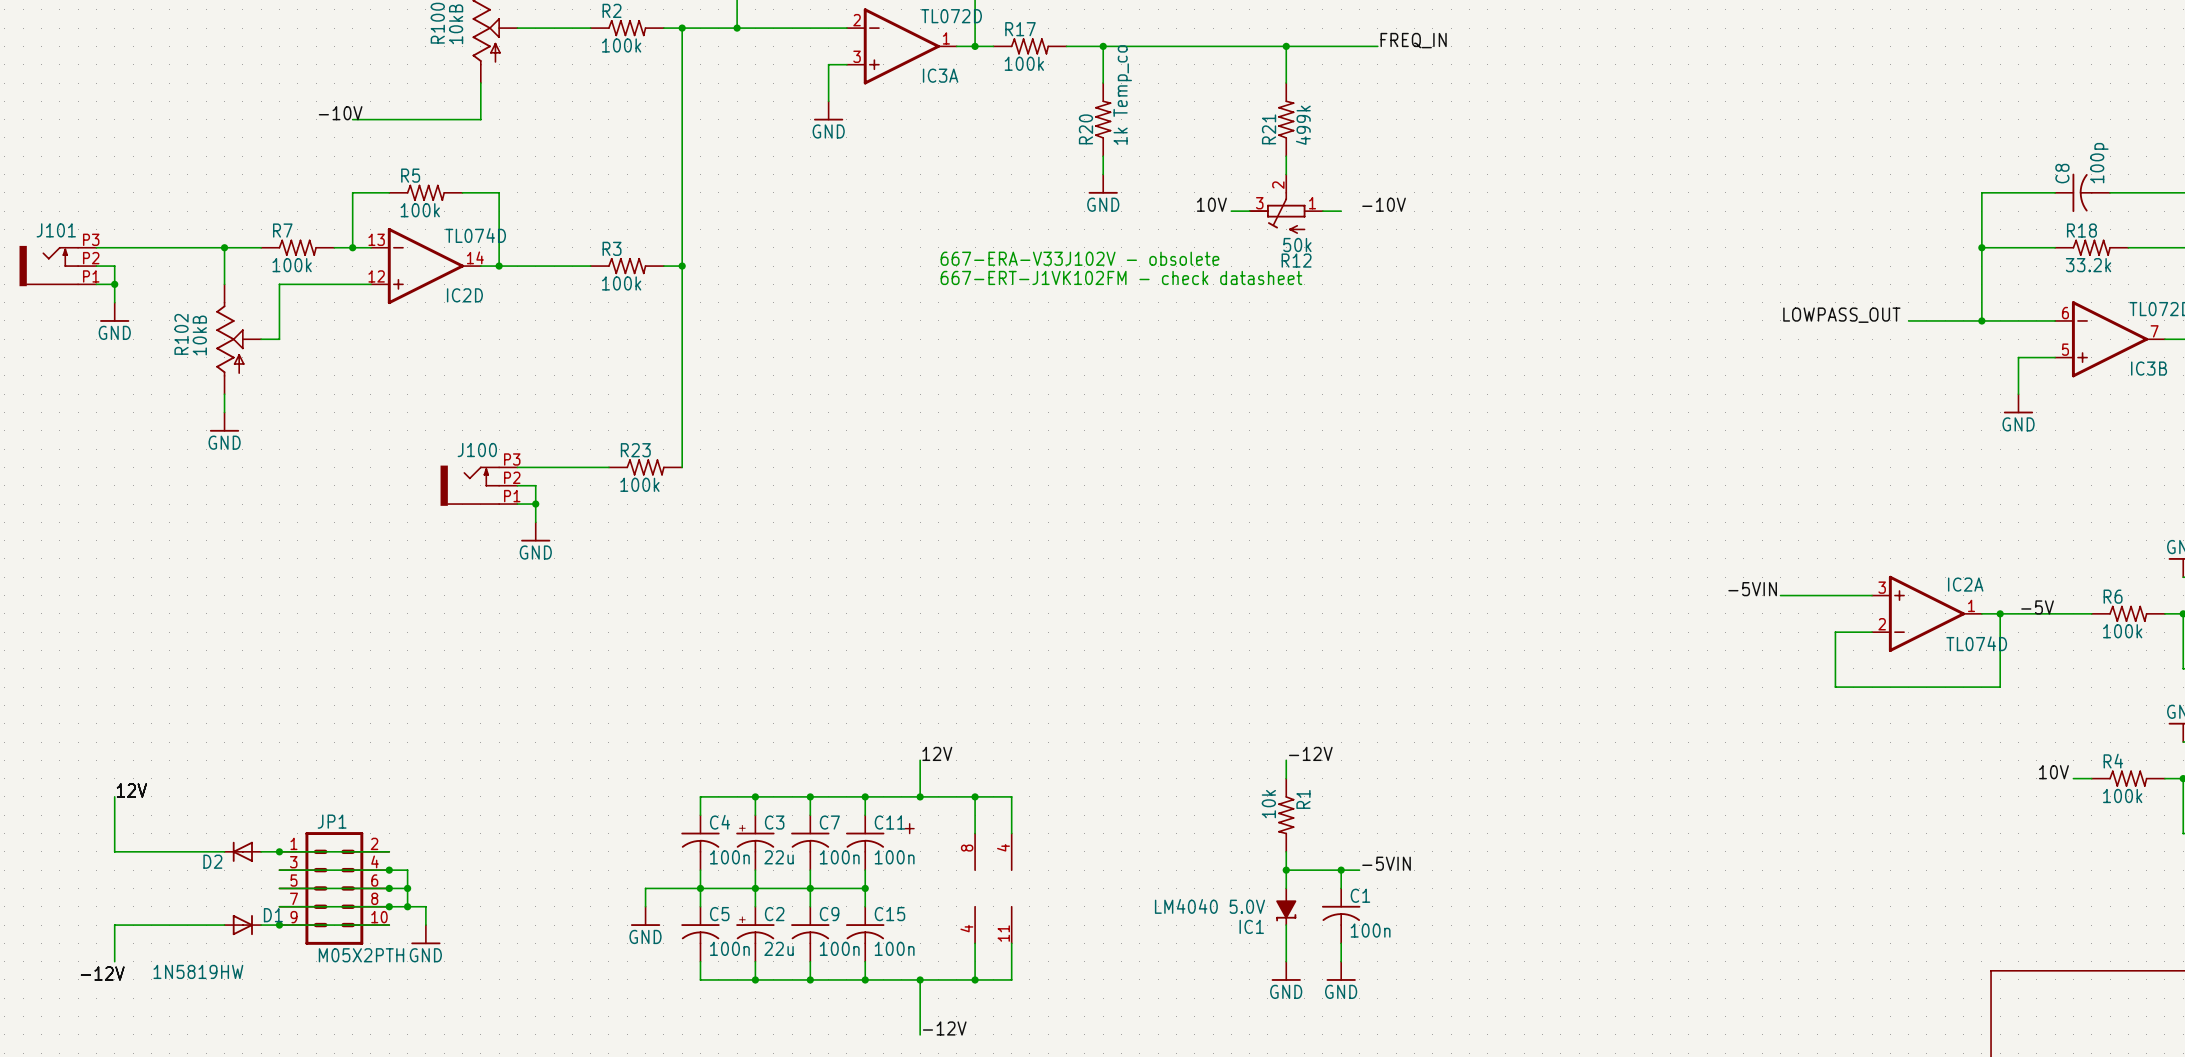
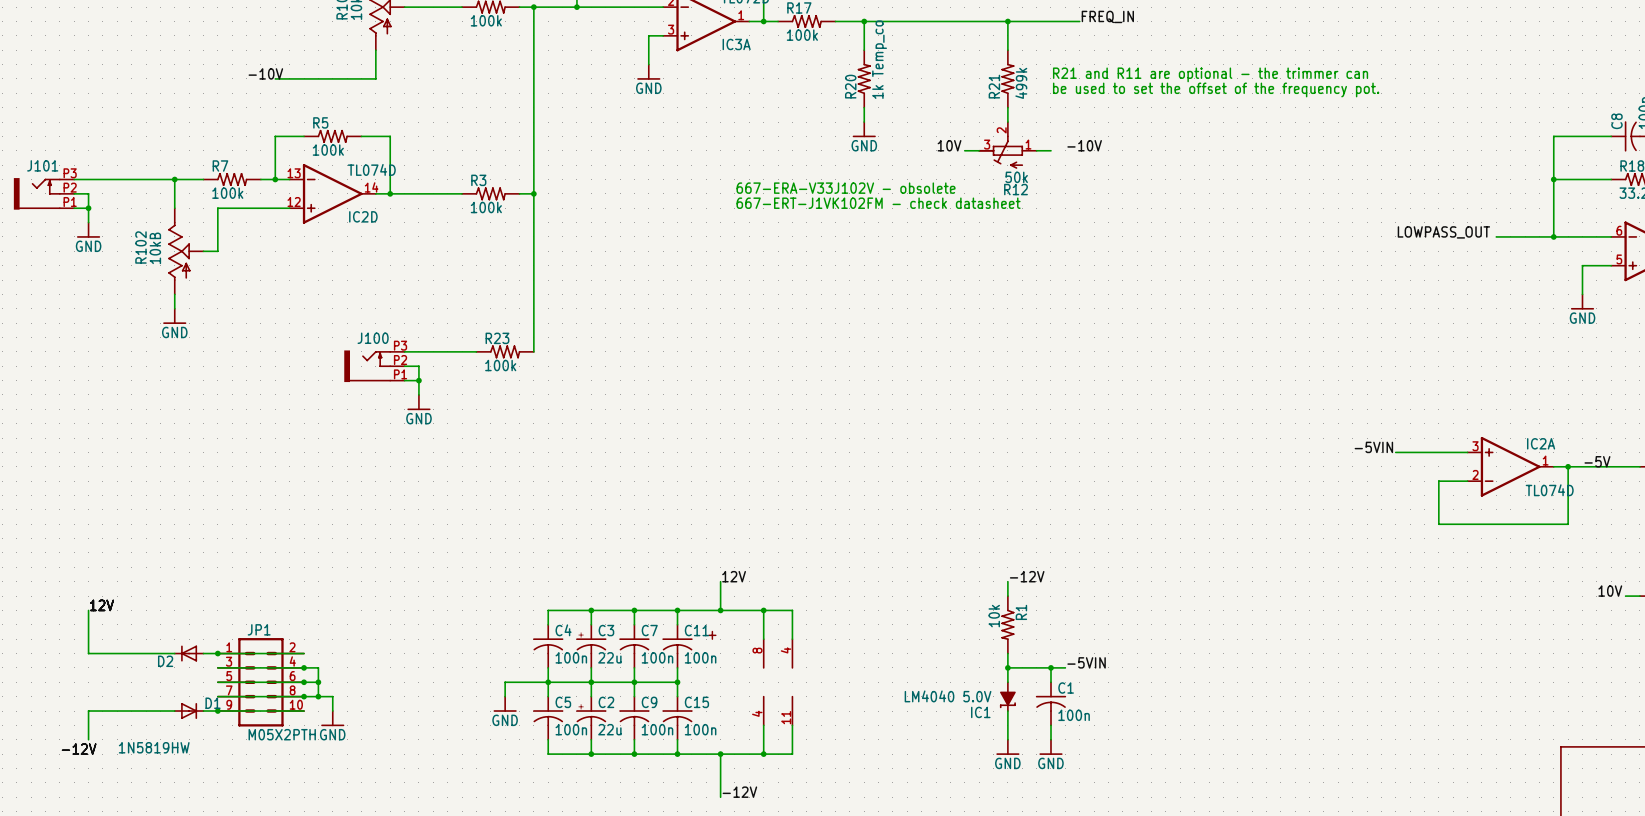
text: none -> R21 and R11 are optional - the trimmer can (1210, 74)
text: none -> be used to set the offset of the frequency pot. (1216, 89)

